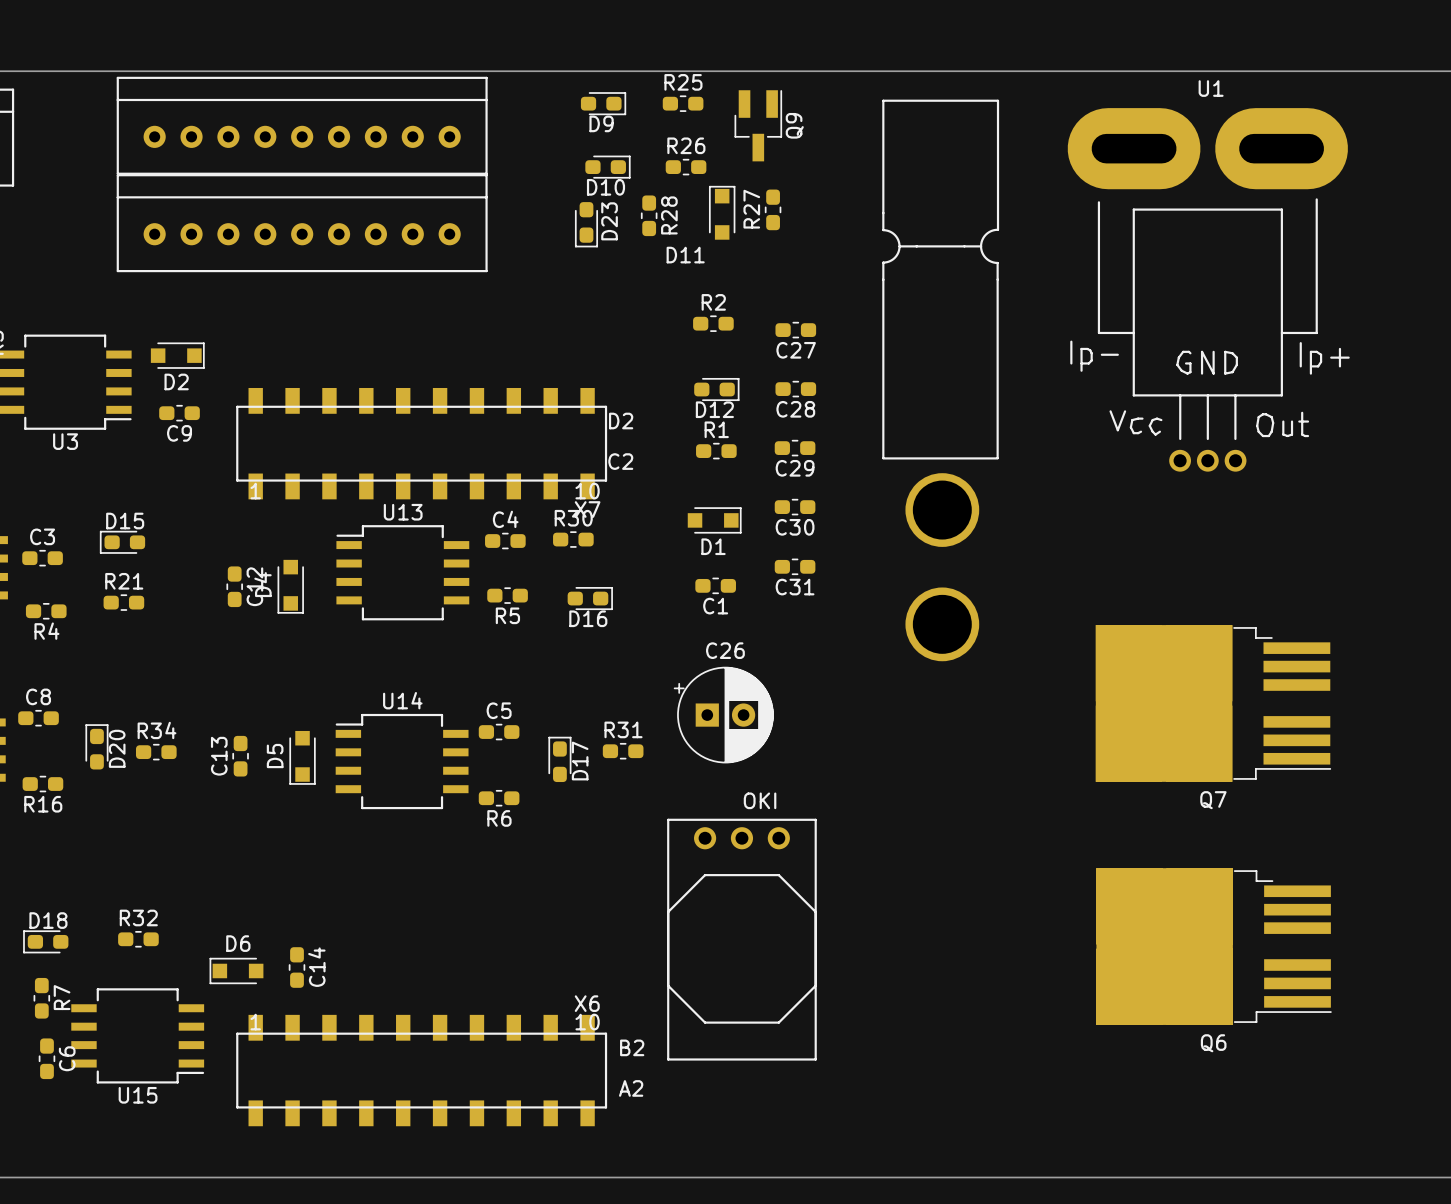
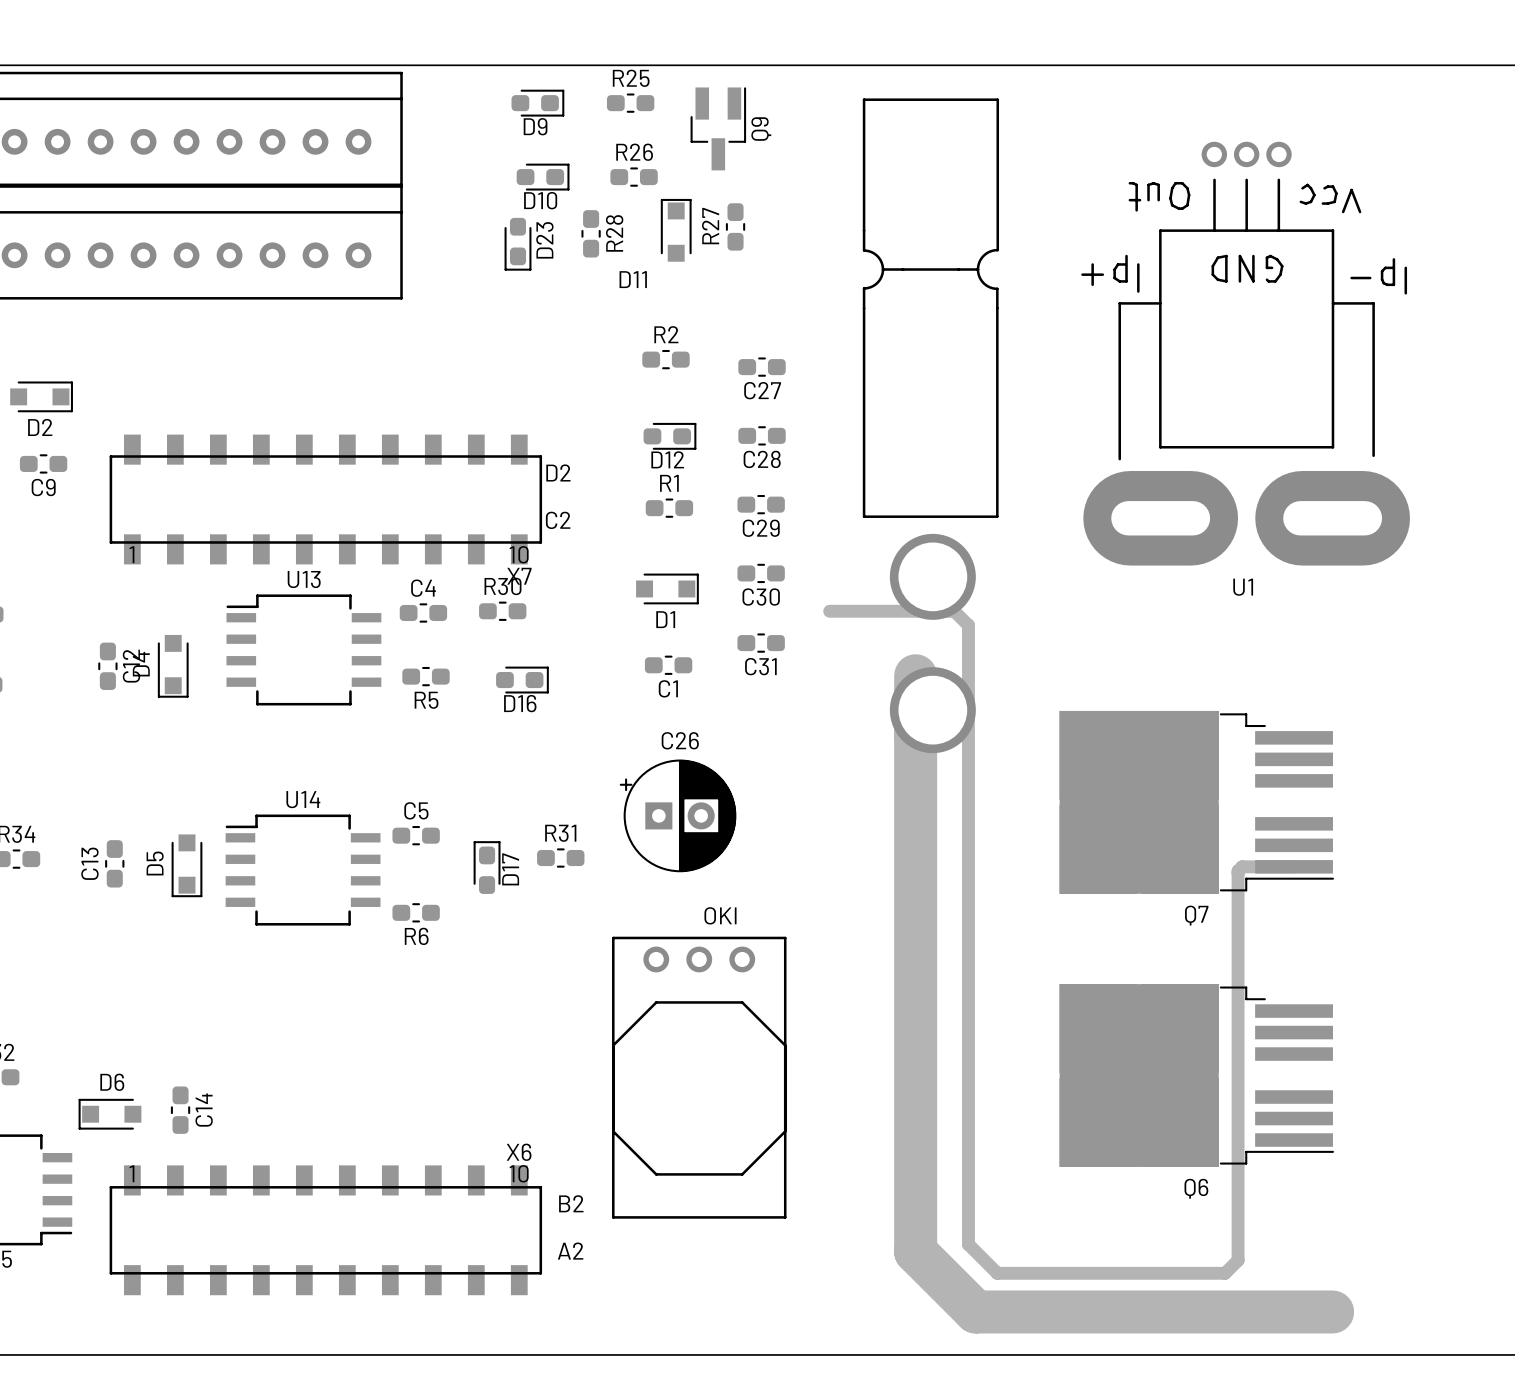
U1 rotation: 0° (1208, 289) -> 180° (1245, 353)
track: none -> (829, 611) (954, 611) (968, 625) (968, 1244) (997, 1273) (1225, 1273) (1238, 1260) (1238, 870) (1242, 866) (1294, 866)
track: none -> (915, 675) (915, 1251) (975, 1311) (1332, 1311)
Q7 position: (1213, 703) -> (1196, 802)
Q6 position: (1214, 946) -> (1196, 1075)

